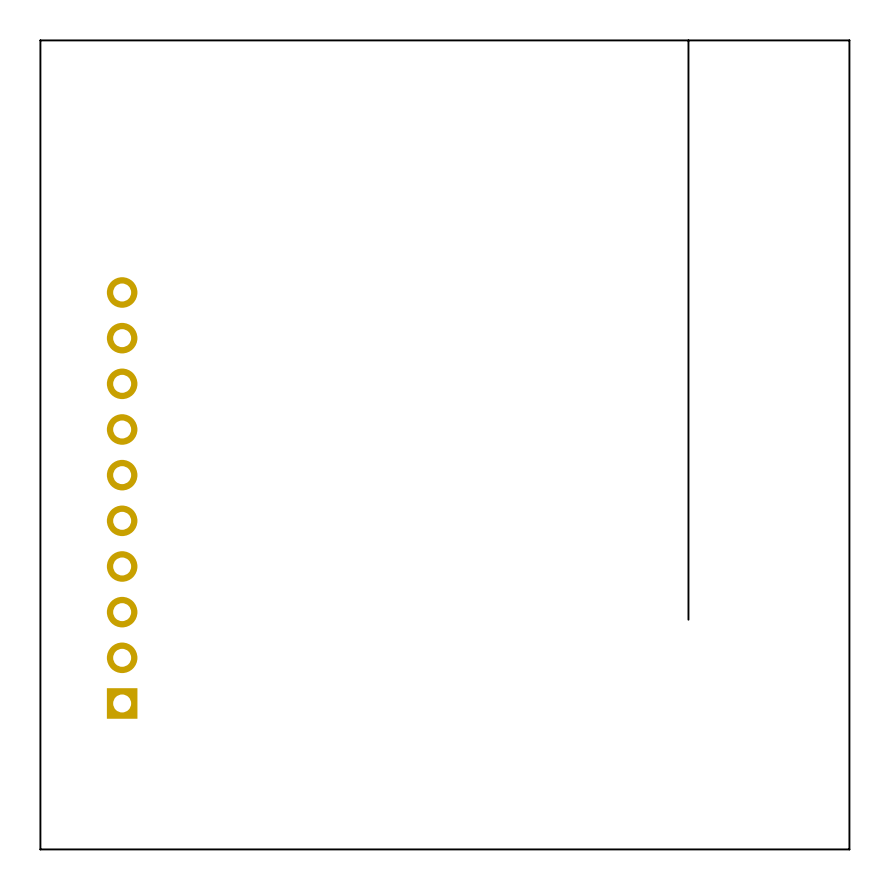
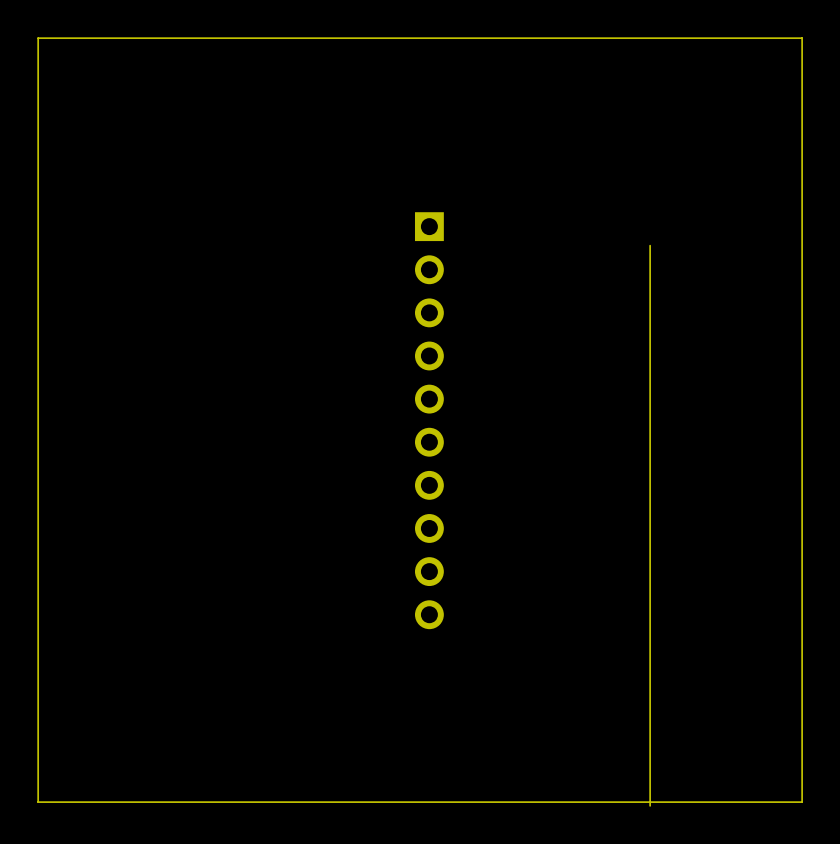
board edge: (688, 40) (688, 260) -> none
part rotation: 0° (122, 497) -> 180° (429, 420)
part position: (122, 497) -> (429, 420)
board edge: none -> (650, 585) (650, 805)

